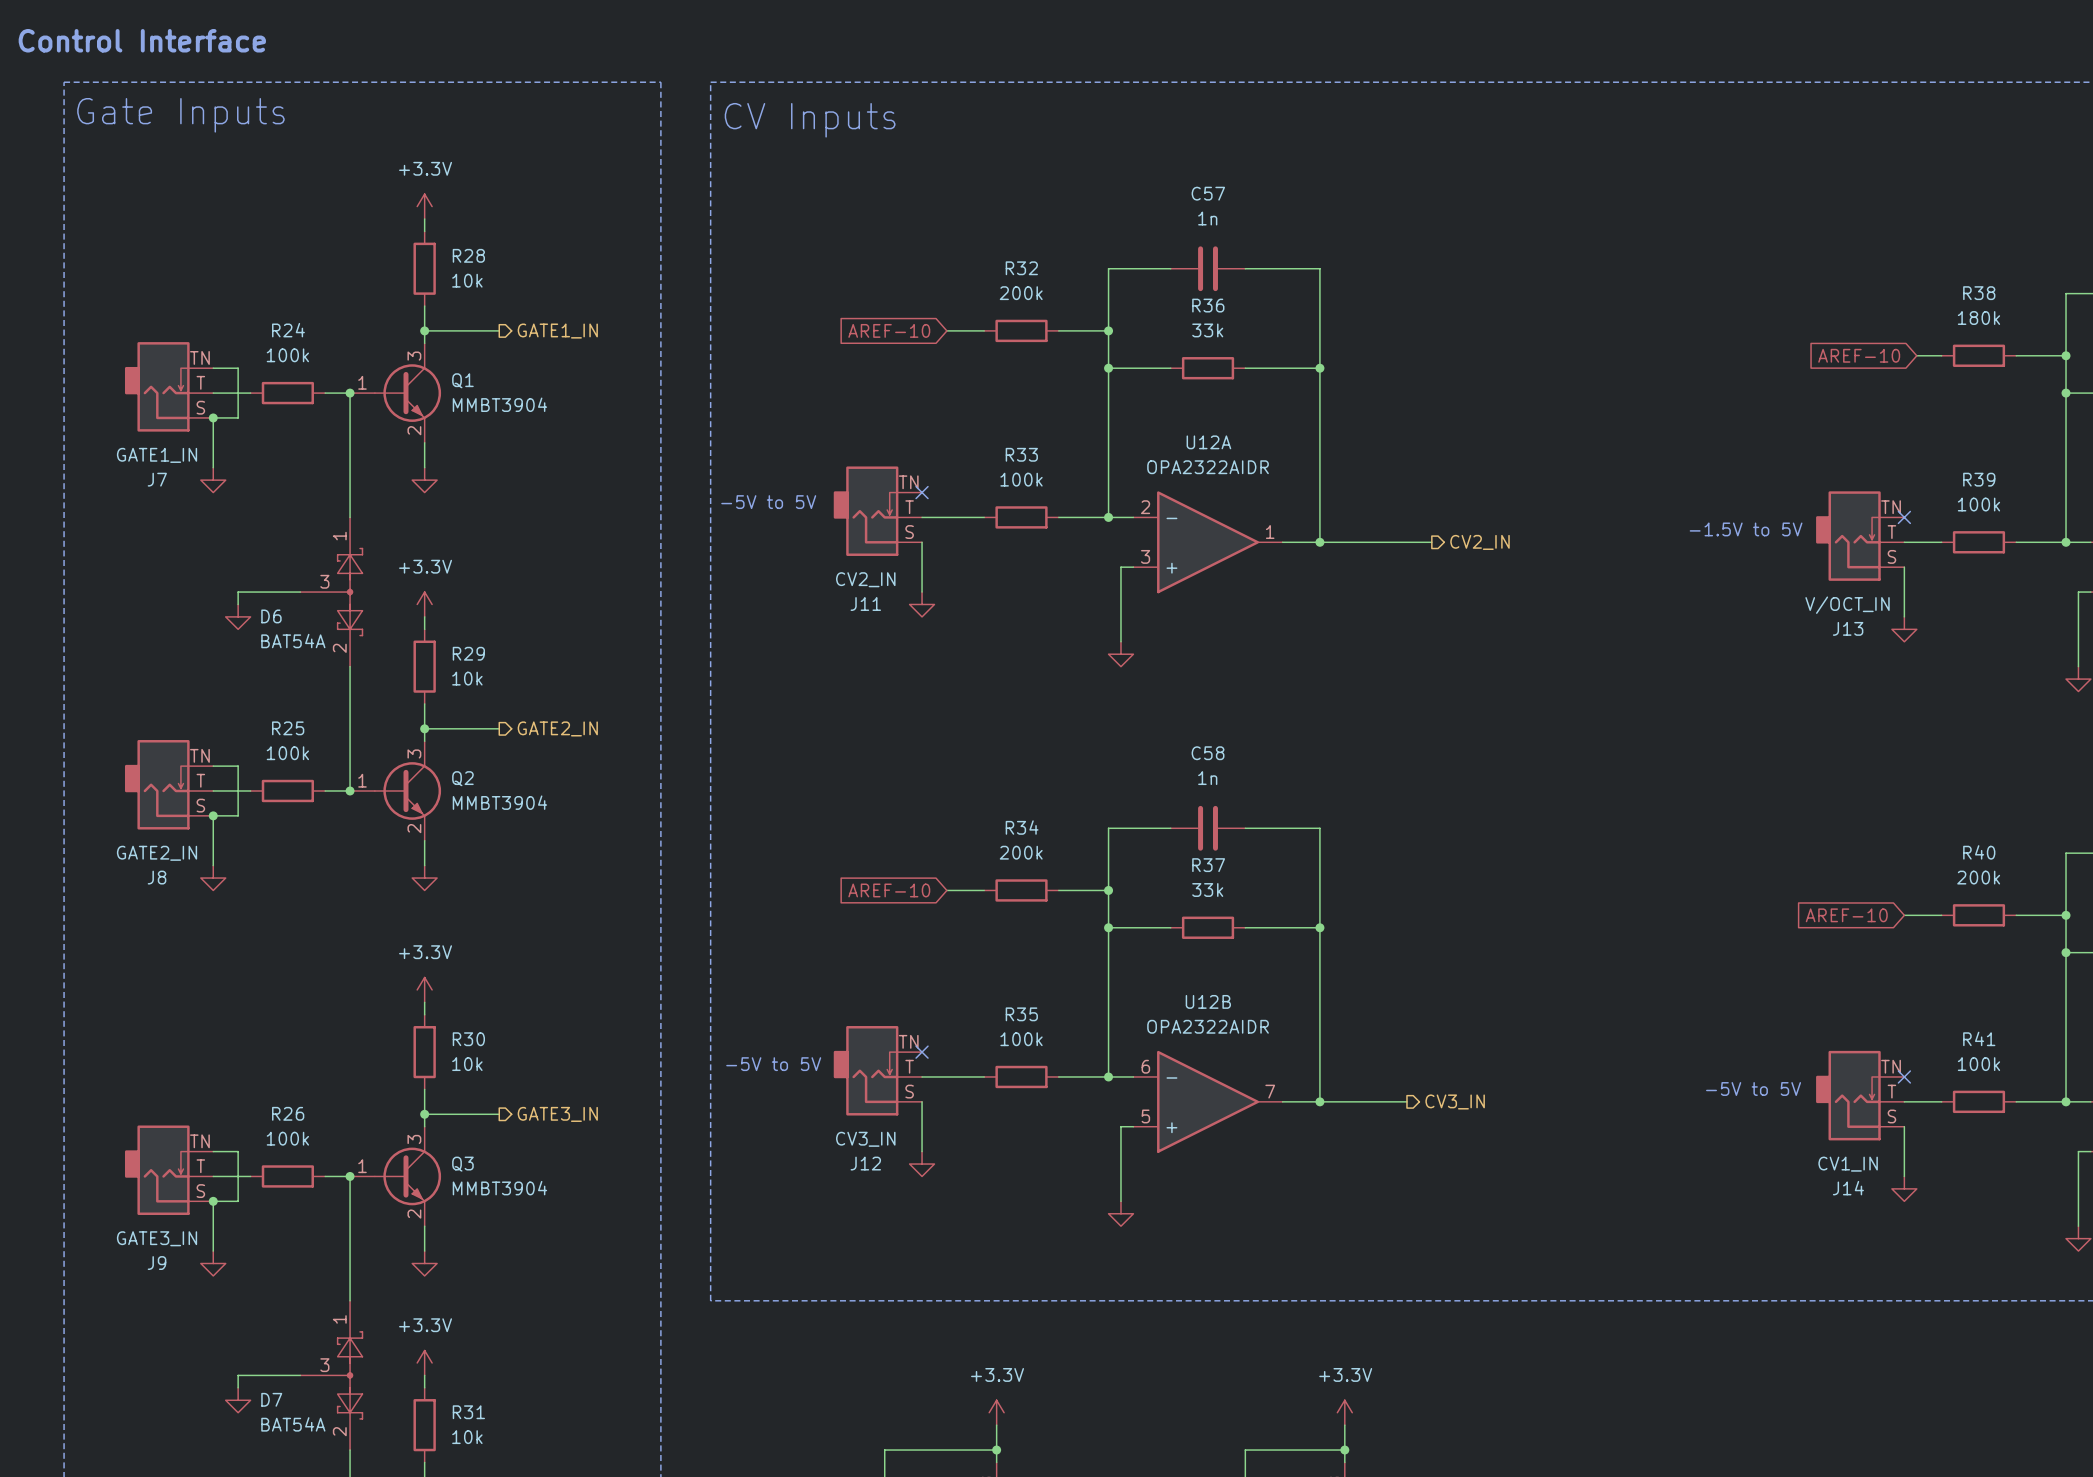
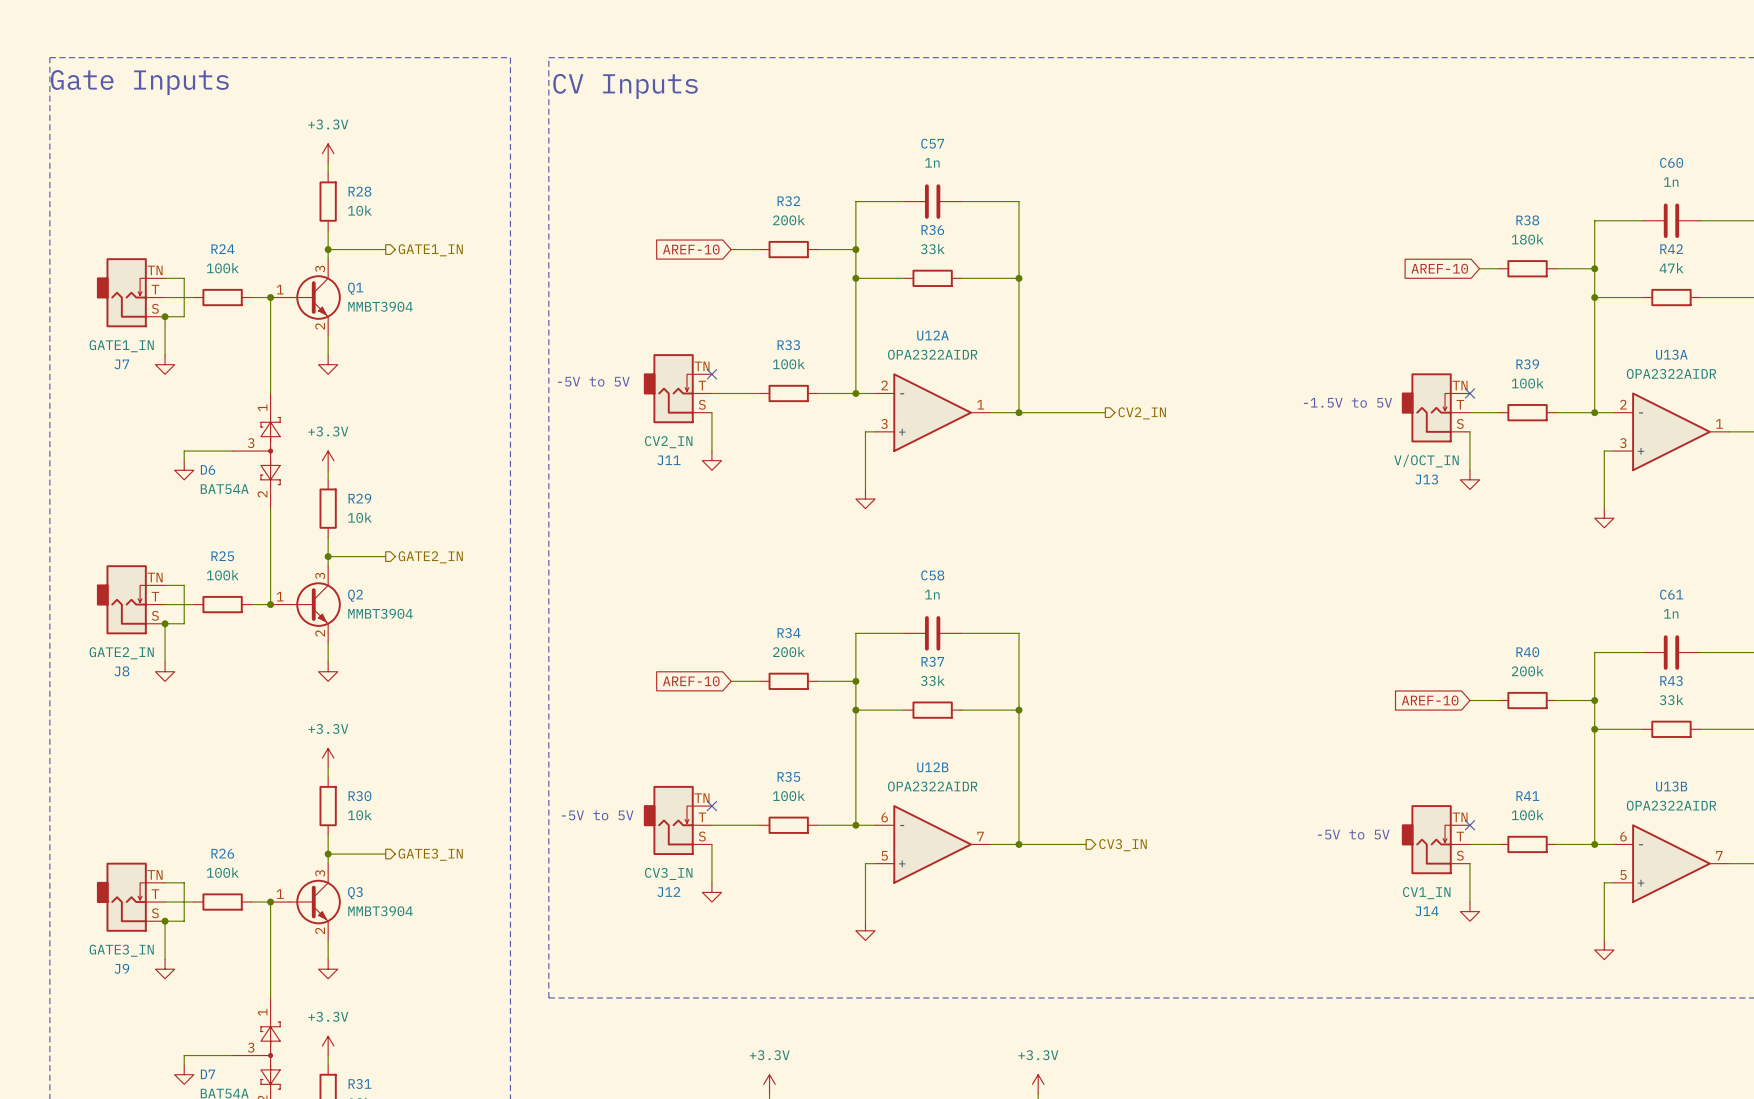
text: Control Interface (142, 40) -> none

